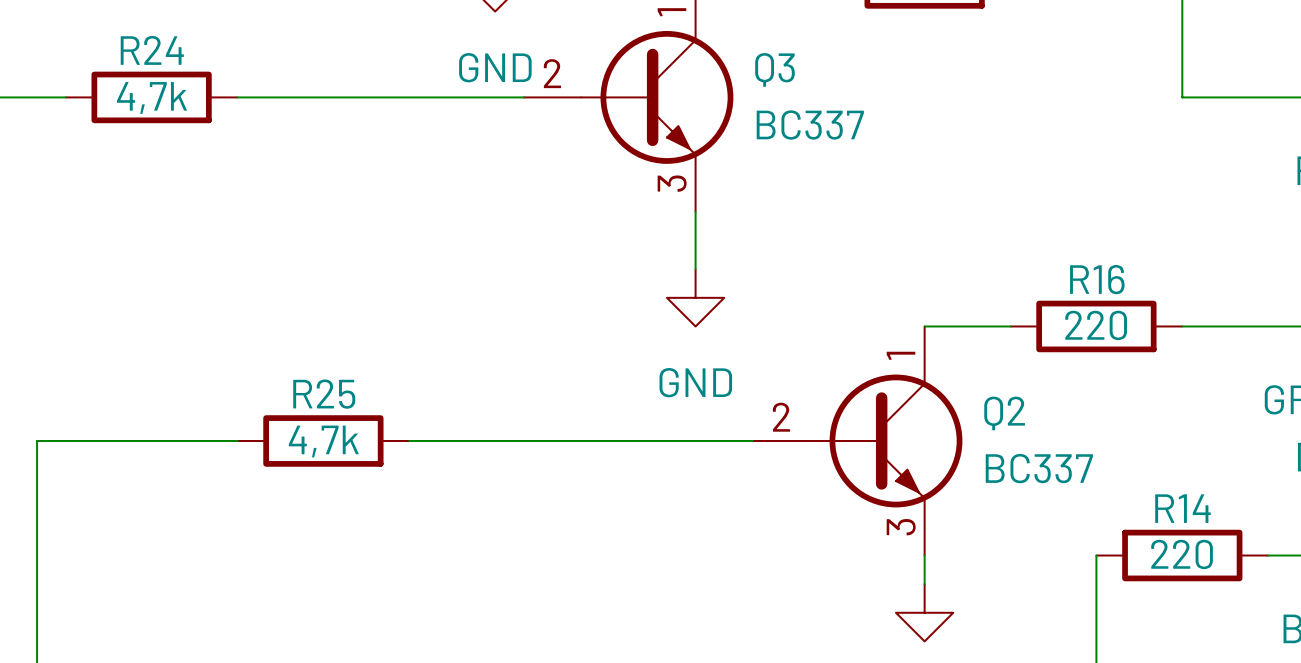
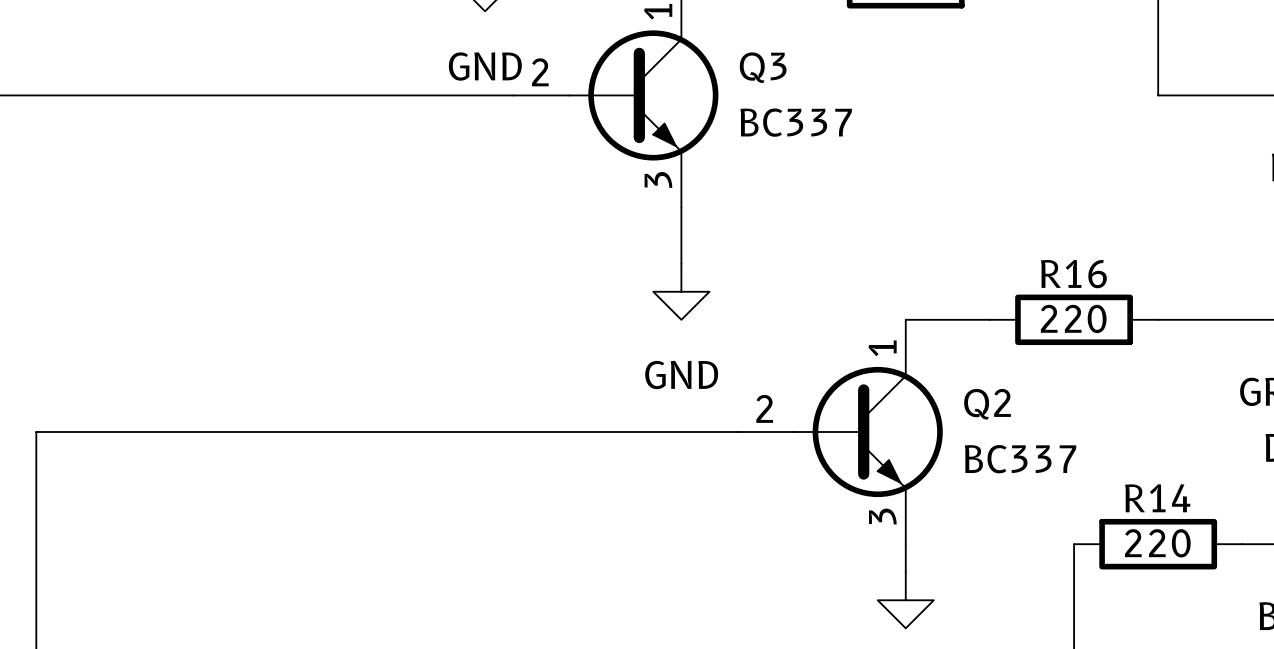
wire: none -> (64, 95) (232, 95)
R24: 4,7k (151, 97) -> none
wire: none -> (232, 432) (400, 432)
R25: 4,7k (323, 440) -> none

